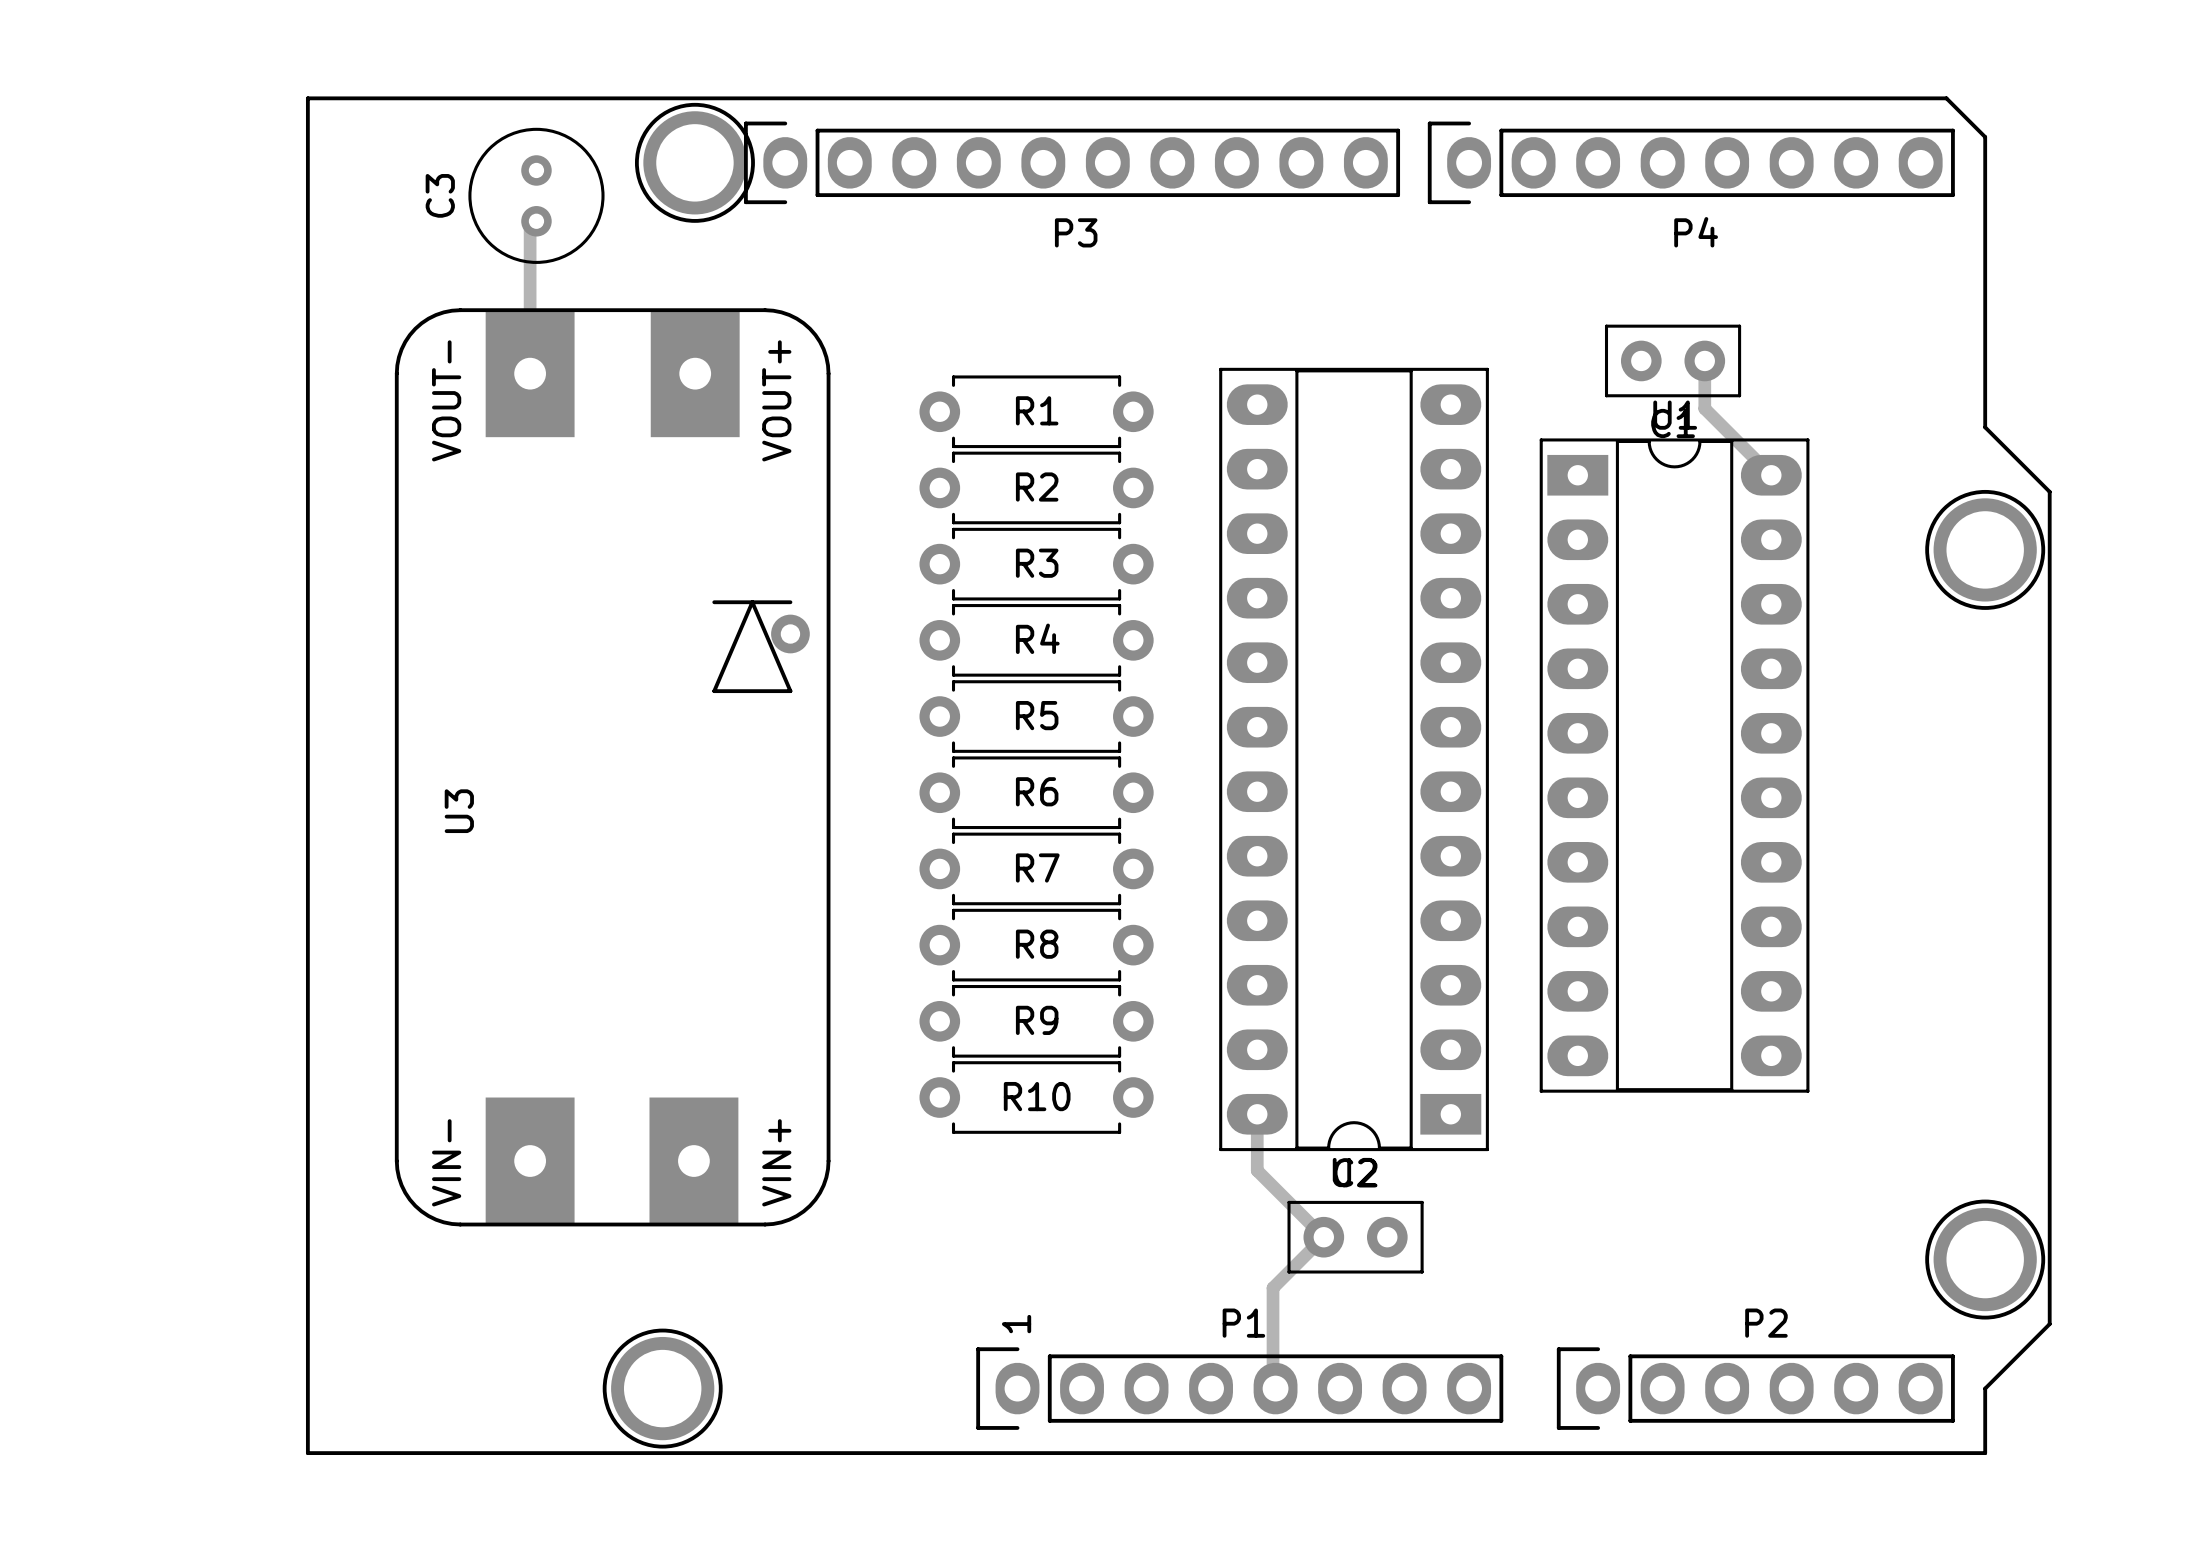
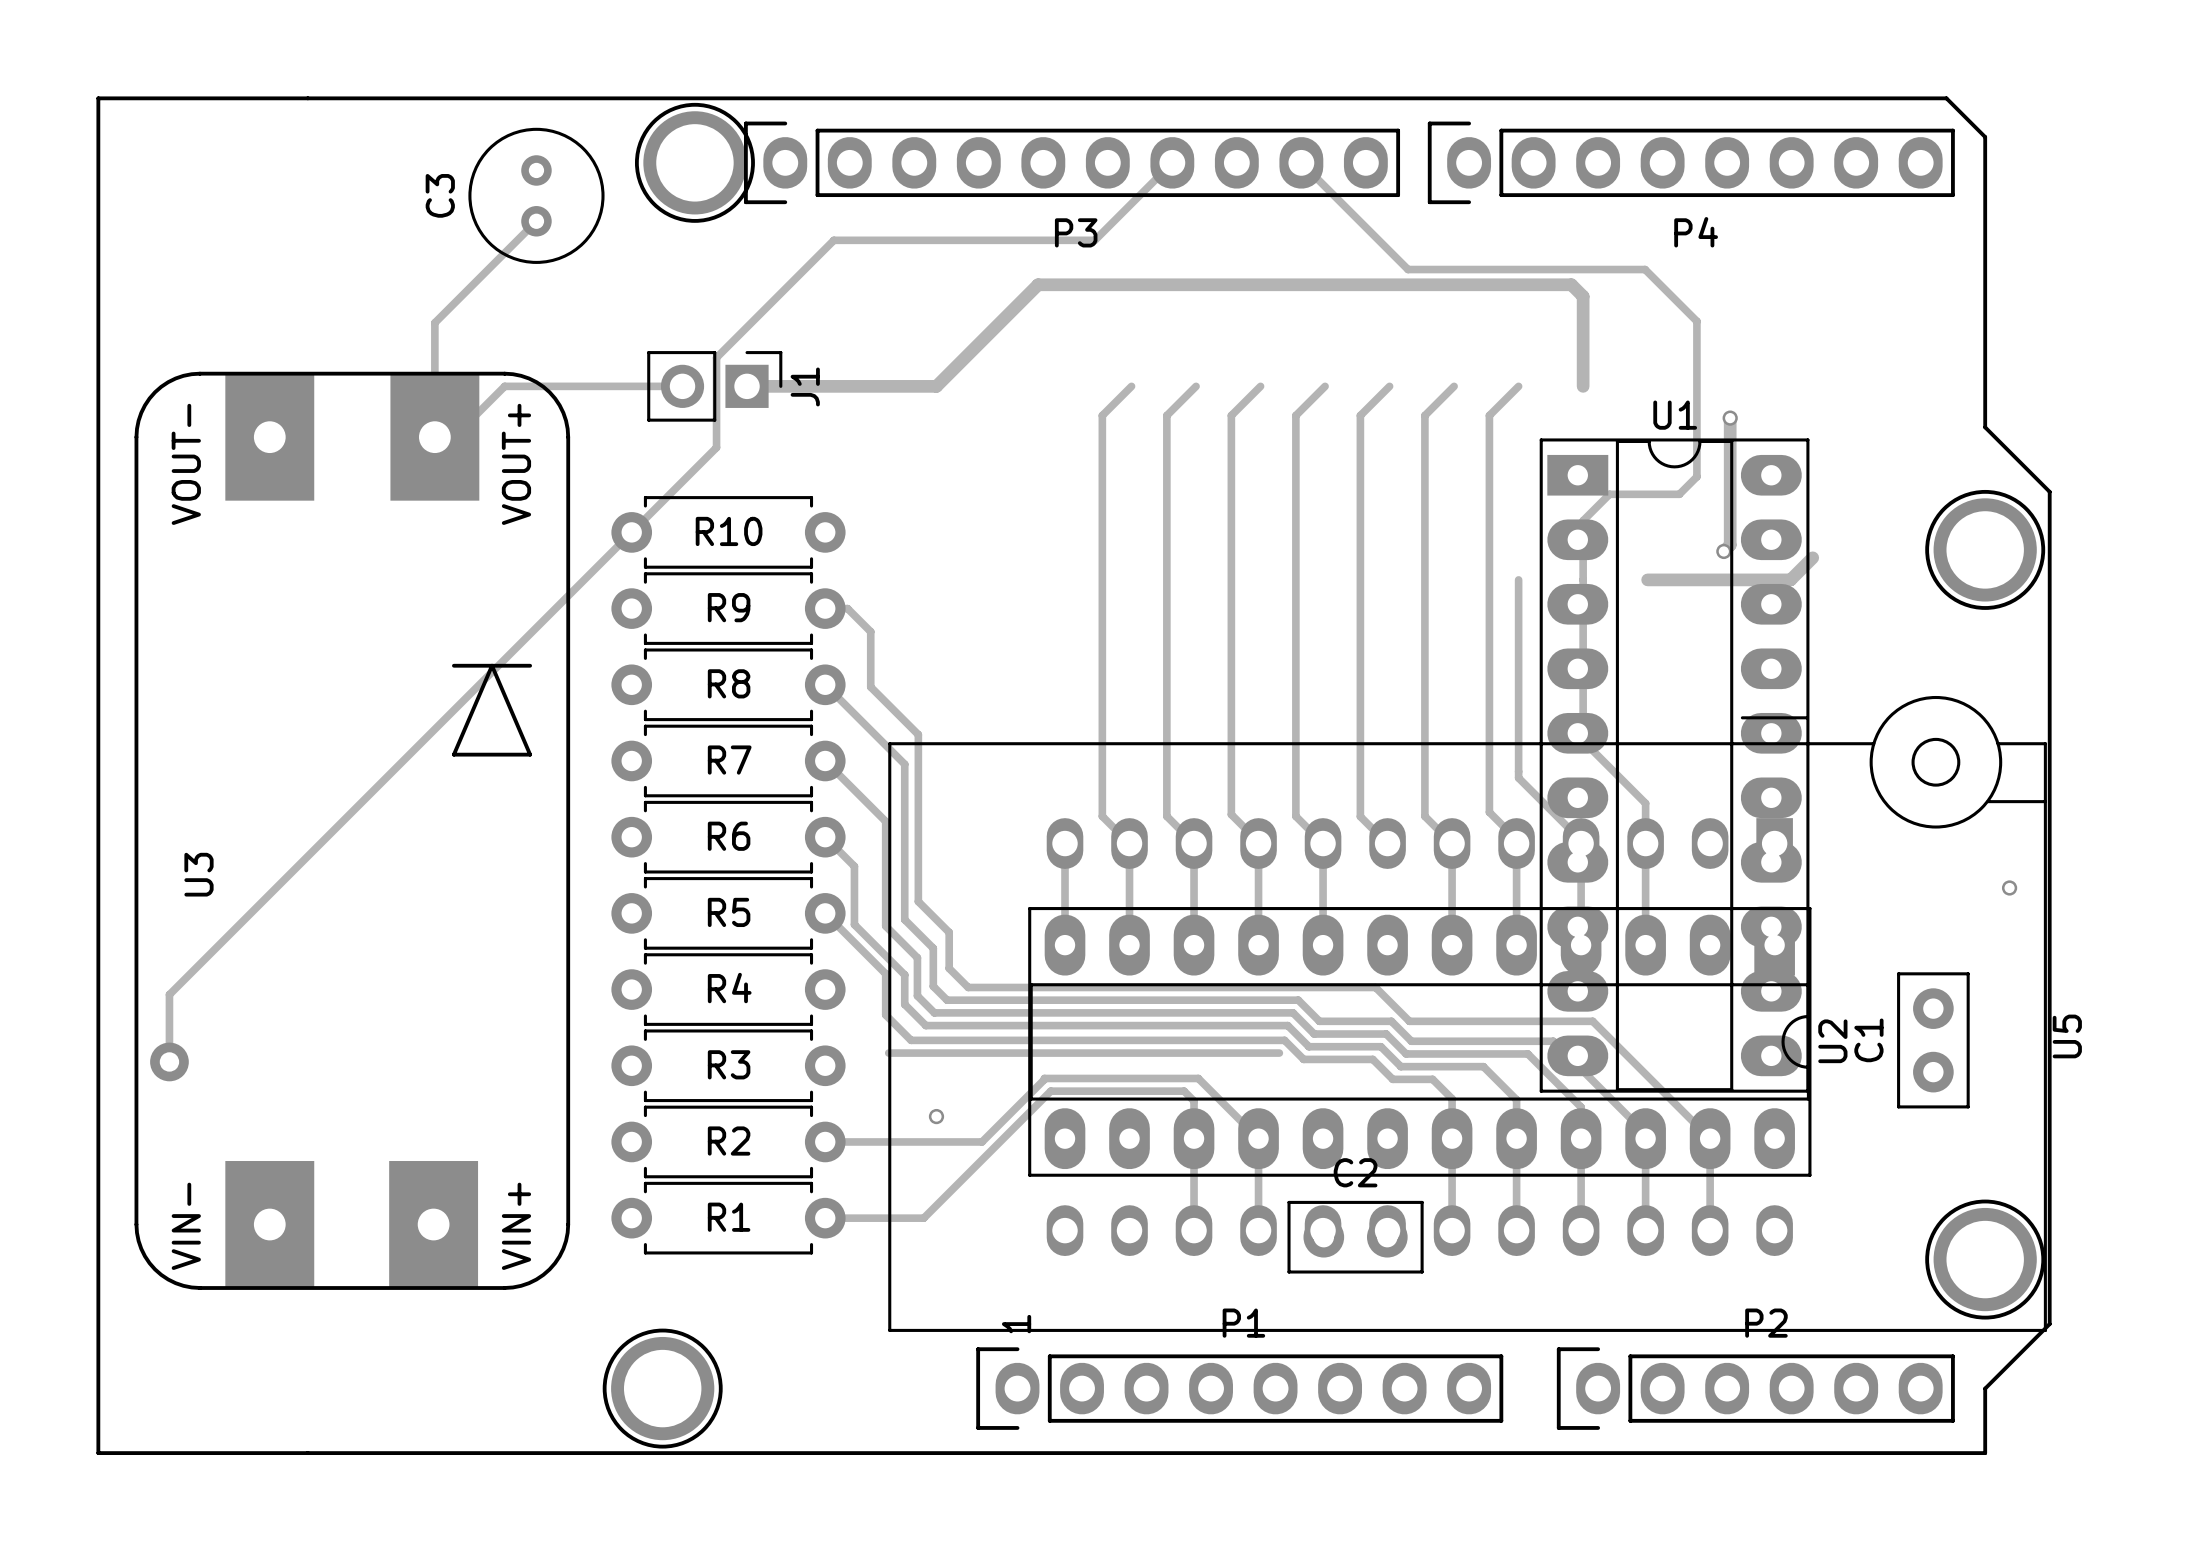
board edge: (307, 98) (307, 1453) -> (307, 98) (98, 98) (98, 1453) (307, 1453)
track: none -> (1172, 162) (1094, 240) (833, 240) (716, 357) (716, 447) (169, 994) (169, 1061)
track: none -> (1301, 162) (1408, 269) (1645, 269) (1696, 321) (1696, 476) (1679, 494) (1609, 494) (1583, 520) (1583, 740) (1645, 803) (1645, 945)
track: (530, 227) (530, 373) -> (530, 227) (434, 322) (434, 437) (453, 437) (504, 386) (682, 386)
U3 footprint: [394, 308, 831, 1227] -> [134, 371, 571, 1290]
C1 rotation: 0° (1673, 360) -> 90° clockwise (1933, 1040)
C1 position: (1673, 360) -> (1933, 1040)
track: (1704, 360) (1704, 408) (1771, 475) -> none
J1: none -> (714, 386)
track: none -> (747, 386) (936, 386) (1038, 284) (1571, 284) (1583, 296) (1583, 386)
track: none -> (1131, 386) (1102, 415) (1102, 816) (1129, 843) (1129, 945)
track: none -> (1196, 386) (1166, 415) (1166, 816) (1194, 843) (1194, 945)
track: none -> (1260, 386) (1231, 415) (1231, 814) (1258, 841) (1258, 945)
track: none -> (1325, 386) (1295, 415) (1295, 816) (1323, 843) (1323, 945)
track: none -> (1389, 386) (1360, 415) (1360, 816) (1387, 843)
track: none -> (1454, 386) (1424, 415) (1424, 816) (1452, 843) (1452, 945)
track: none -> (1518, 386) (1489, 415) (1489, 812) (1516, 839) (1516, 945)
R1 position: (1036, 411) -> (728, 1218)
track: none -> (1730, 418) (1730, 545) (1723, 551)
via: none -> (1730, 418)
R2 position: (1036, 487) -> (728, 1141)
via: none -> (1723, 551)
track: none -> (1812, 557) (1790, 579) (1647, 579)
R3 position: (1036, 564) -> (728, 1065)
track: none -> (1518, 579) (1518, 778) (1581, 840) (1581, 945)
track: none -> (825, 608) (847, 608) (870, 631) (870, 687) (918, 734) (918, 901) (949, 932) (949, 968) (968, 987) (1375, 987) (1409, 1021) (1592, 1021) (1710, 1138) (1710, 1230)
R4 position: (1036, 640) -> (728, 989)
track: none -> (825, 684) (904, 764) (904, 919) (933, 948) (933, 986) (947, 1000) (1298, 1000) (1319, 1021) (1391, 1021) (1411, 1041) (1553, 1041) (1645, 1133) (1645, 1230)
R5 position: (1036, 716) -> (728, 913)
U2 rotation: 0° (1354, 759) -> 90° counterclockwise (1419, 1041)
track: none -> (825, 760) (885, 821) (885, 926) (917, 957) (917, 995) (934, 1012) (1293, 1012) (1314, 1034) (1386, 1034) (1406, 1053) (1527, 1053) (1581, 1107) (1581, 1230)
R6 position: (1036, 792) -> (728, 837)
track: none -> (825, 837) (854, 866) (854, 924) (904, 974) (904, 1004) (925, 1025) (1287, 1025) (1308, 1046) (1380, 1046) (1400, 1066) (1483, 1066) (1516, 1099) (1516, 1230)
track: none -> (1065, 843) (1065, 945)
R7 position: (1036, 868) -> (728, 760)
via: none -> (2009, 887)
track: none -> (825, 913) (885, 973) (885, 1014) (911, 1040) (1284, 1040) (1303, 1059) (1372, 1059) (1392, 1079) (1432, 1079) (1452, 1098) (1452, 1230)
R8 position: (1036, 945) -> (728, 684)
U5: none -> (1467, 1013)
R9 position: (1036, 1021) -> (728, 608)
track: none -> (888, 1053) (1279, 1053)
R10 position: (1036, 1097) -> (728, 532)
track: (1257, 1114) (1257, 1170) (1323, 1237) (1273, 1288) (1273, 1386) (1275, 1388) -> none
via: none -> (936, 1116)
track: none -> (825, 1141) (982, 1141) (1044, 1078) (1198, 1078) (1258, 1138) (1258, 1230)
track: none -> (825, 1218) (923, 1218) (1050, 1091) (1184, 1091) (1194, 1101) (1194, 1230)

